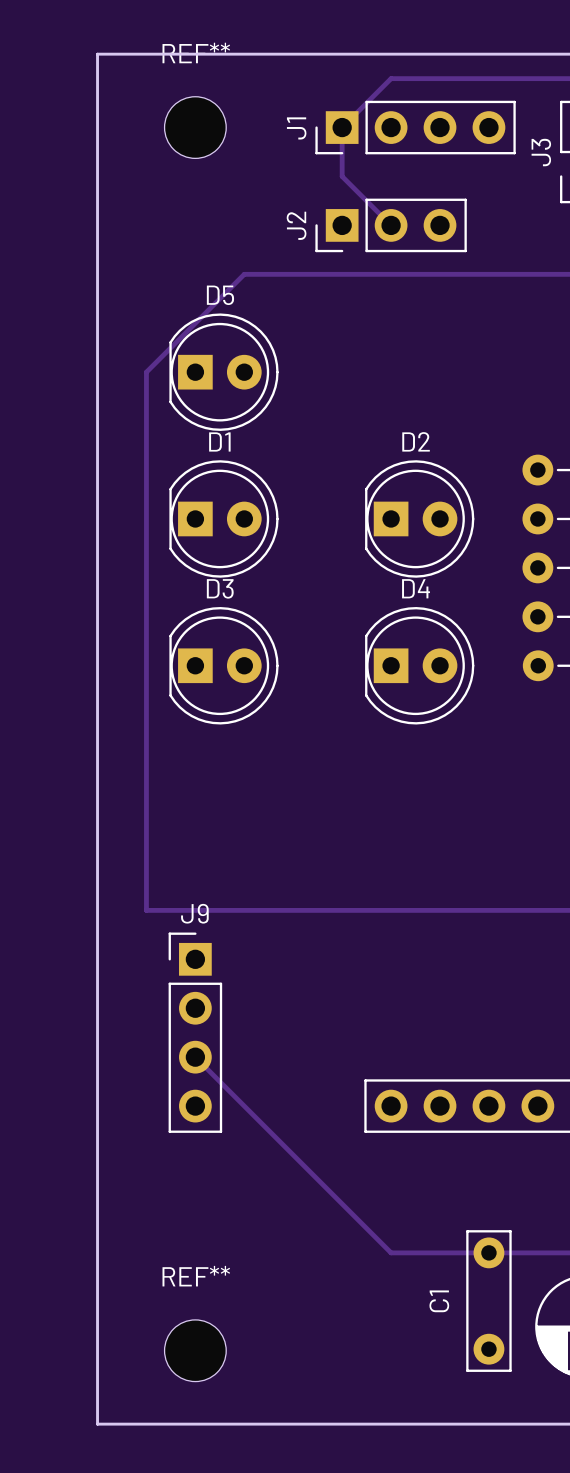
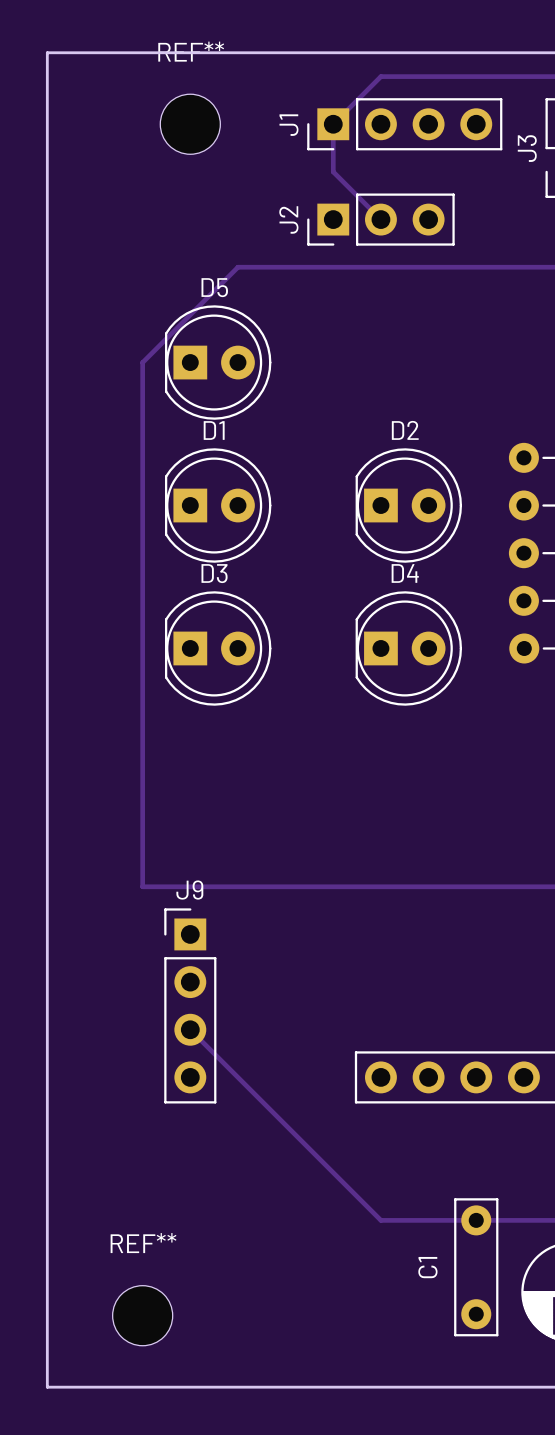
board edge: (97, 54) (97, 1424) -> (95, 52) (47, 52) (47, 1387) (95, 1387)
REF** position: (195, 1350) -> (142, 1315)

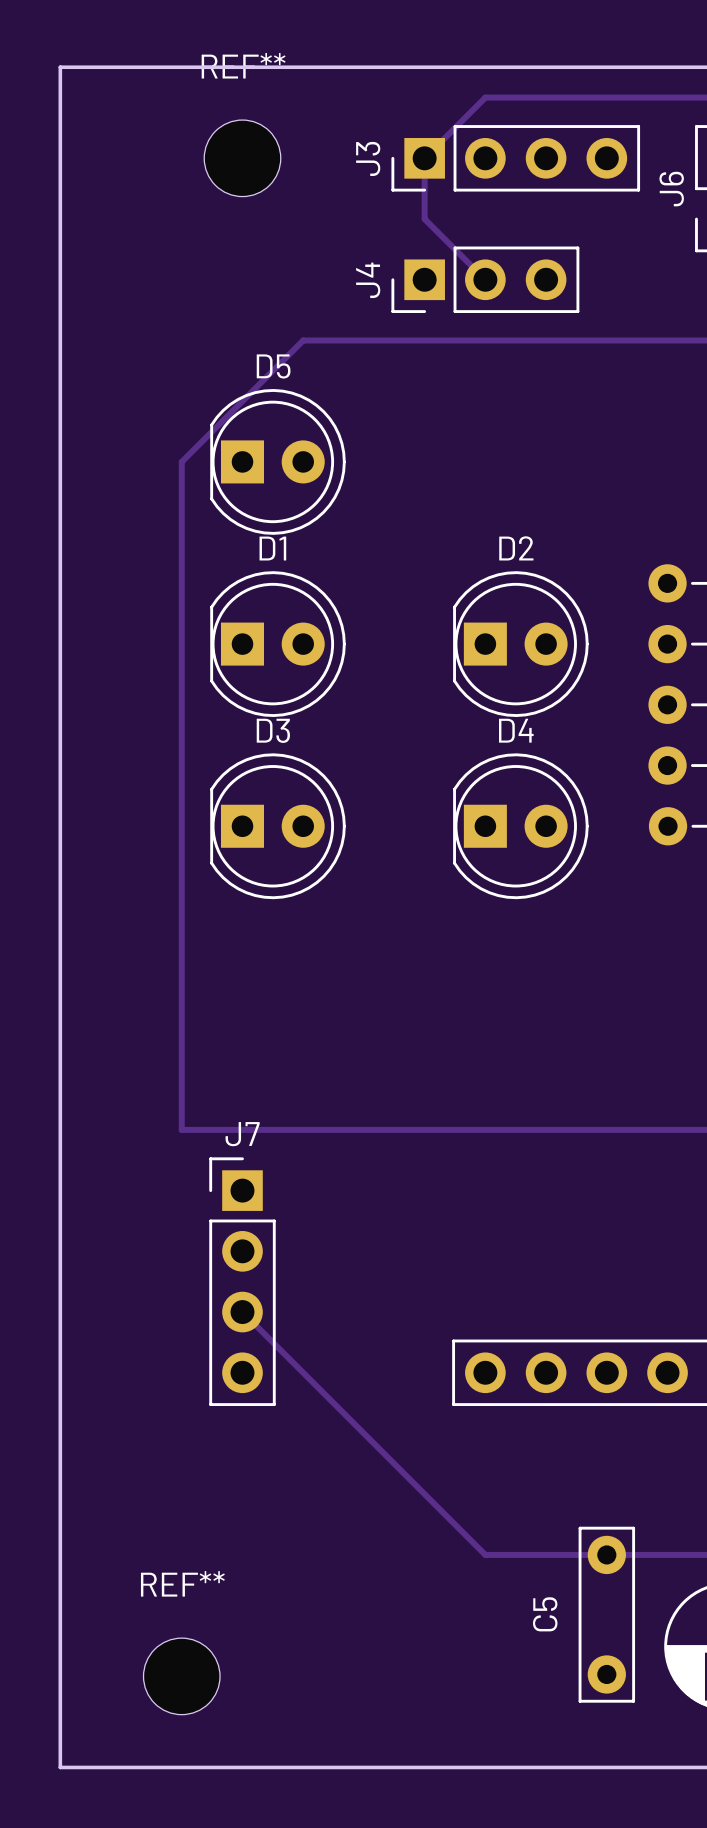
J1 name: J1 (288, 125) -> J3 (368, 158)
J3 name: J3 (527, 148) -> J6 (671, 189)
J2 name: J2 (288, 219) -> J4 (368, 280)
J9 name: J9 (189, 890) -> J7 (242, 1134)
C1 name: C1 (427, 1267) -> C5 (545, 1614)

